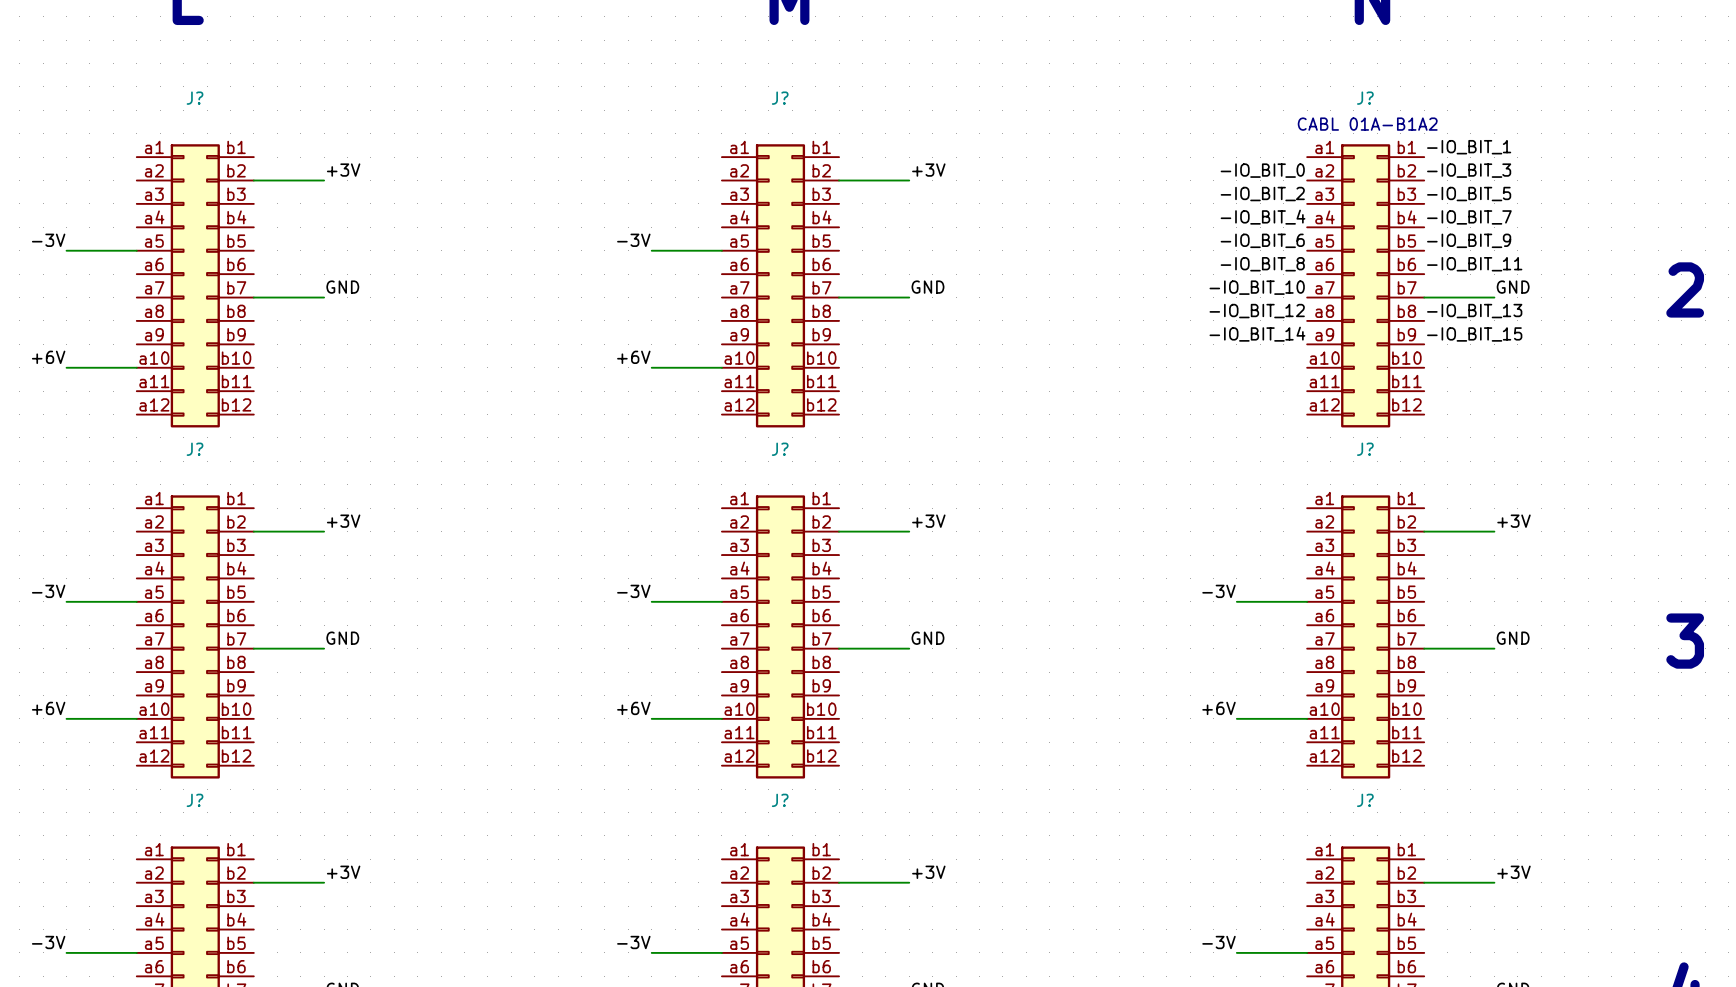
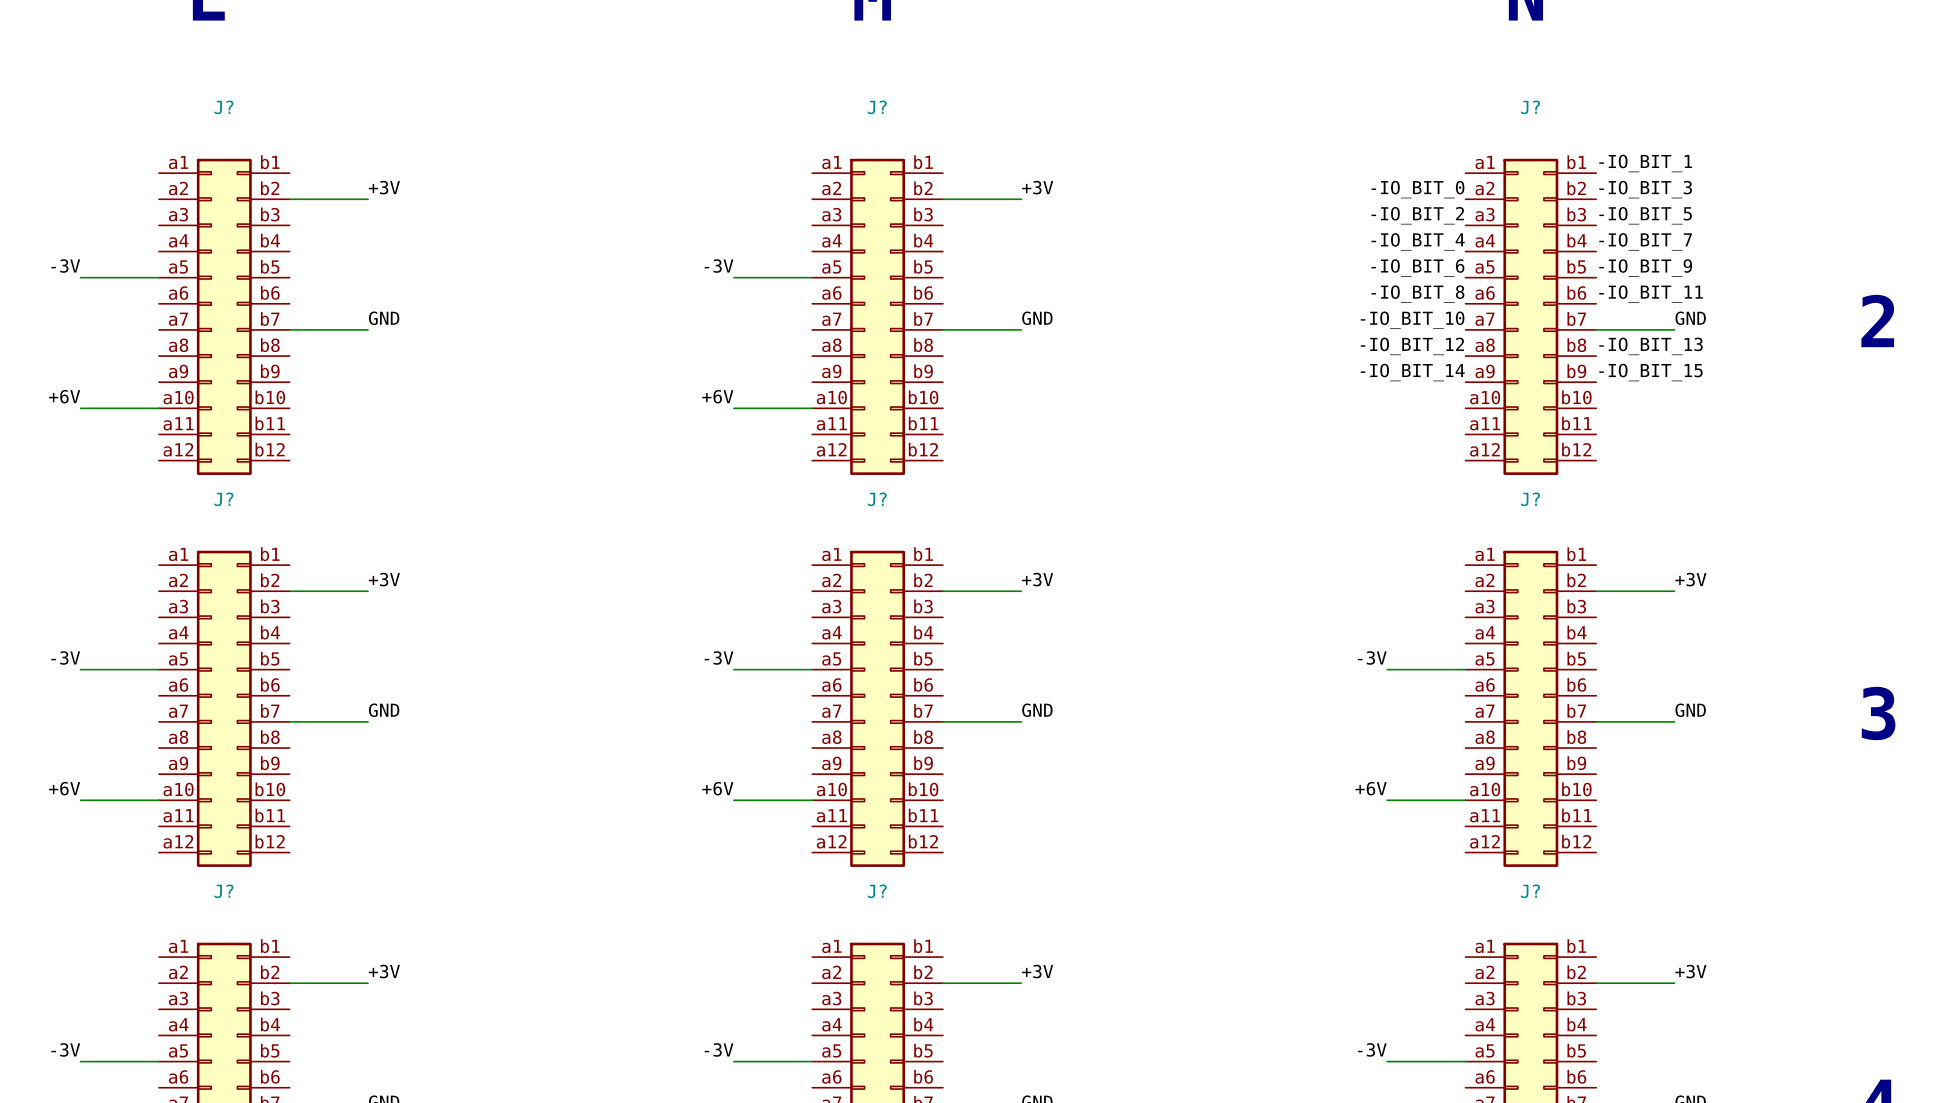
text: CABL 01A-B1A2 (1367, 124) -> none

